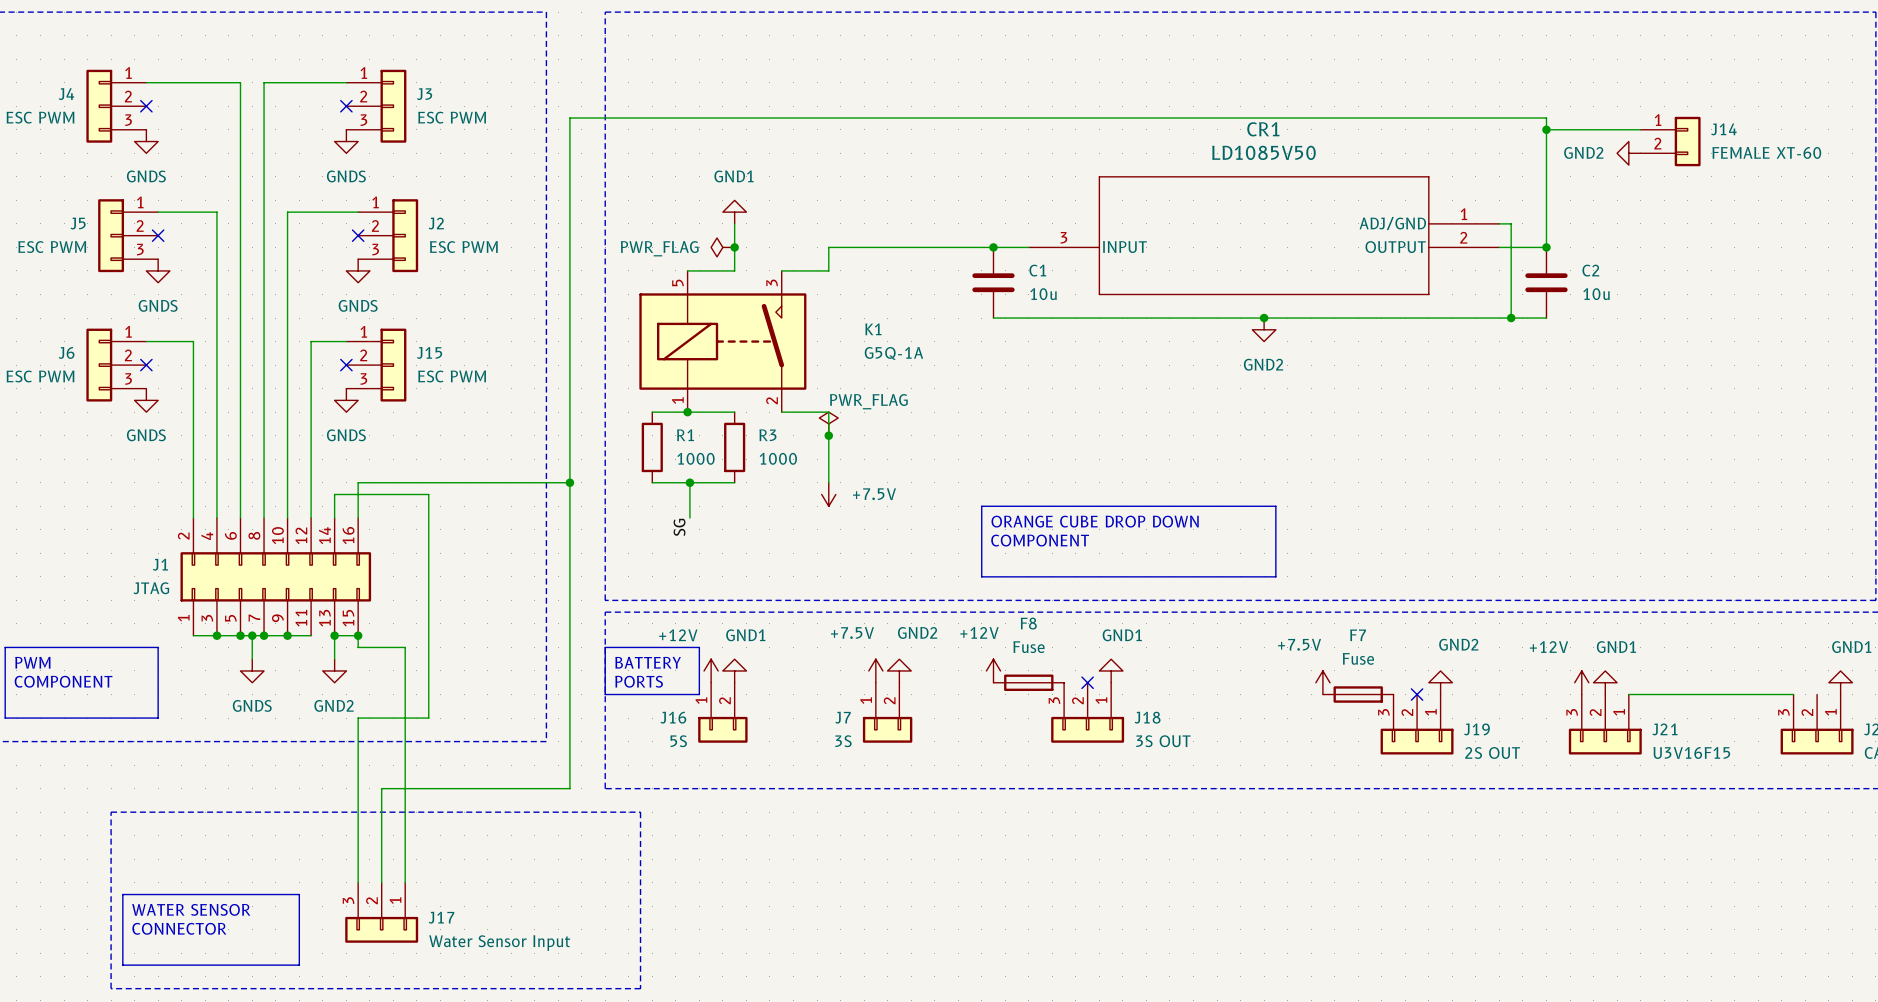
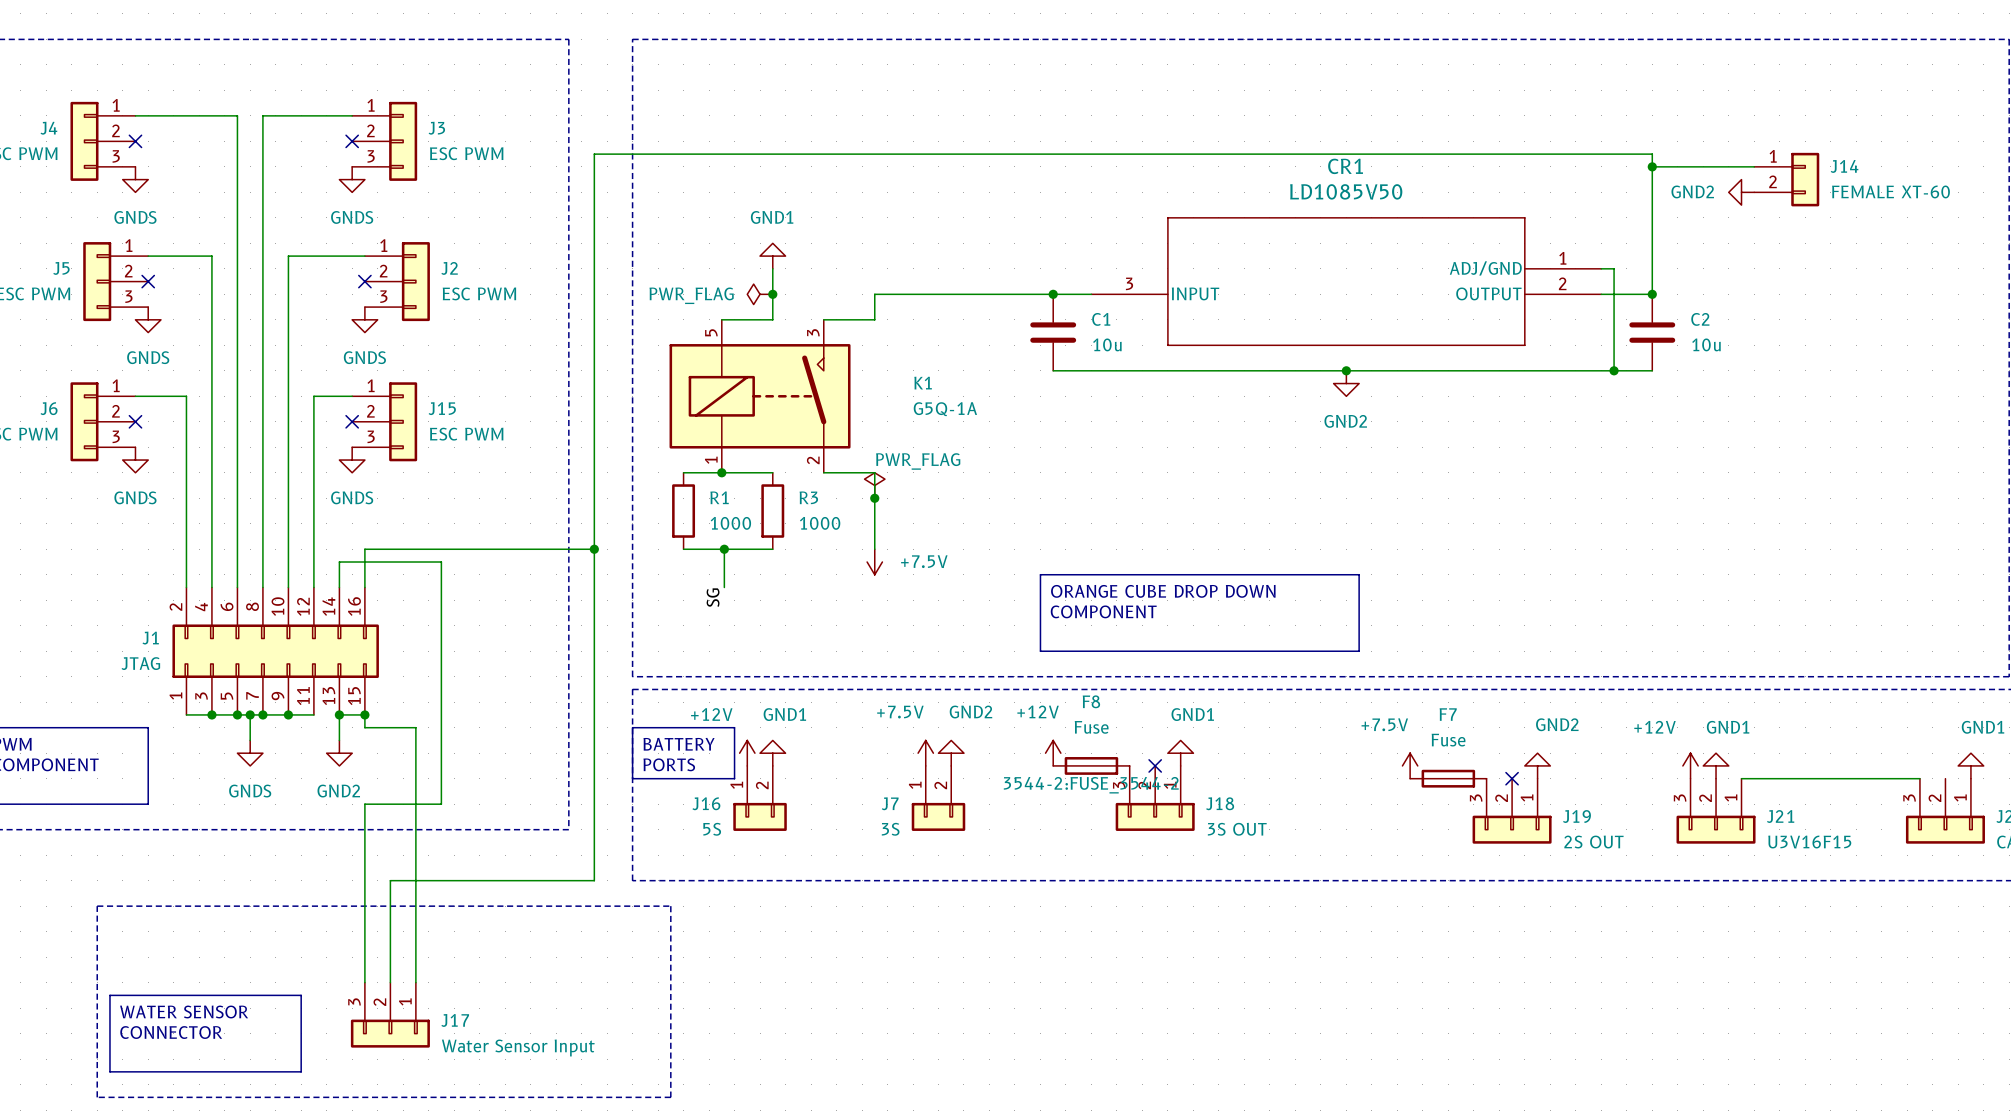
F8 text: none -> 3544-2:FUSE_3544-2 (1091, 785)

